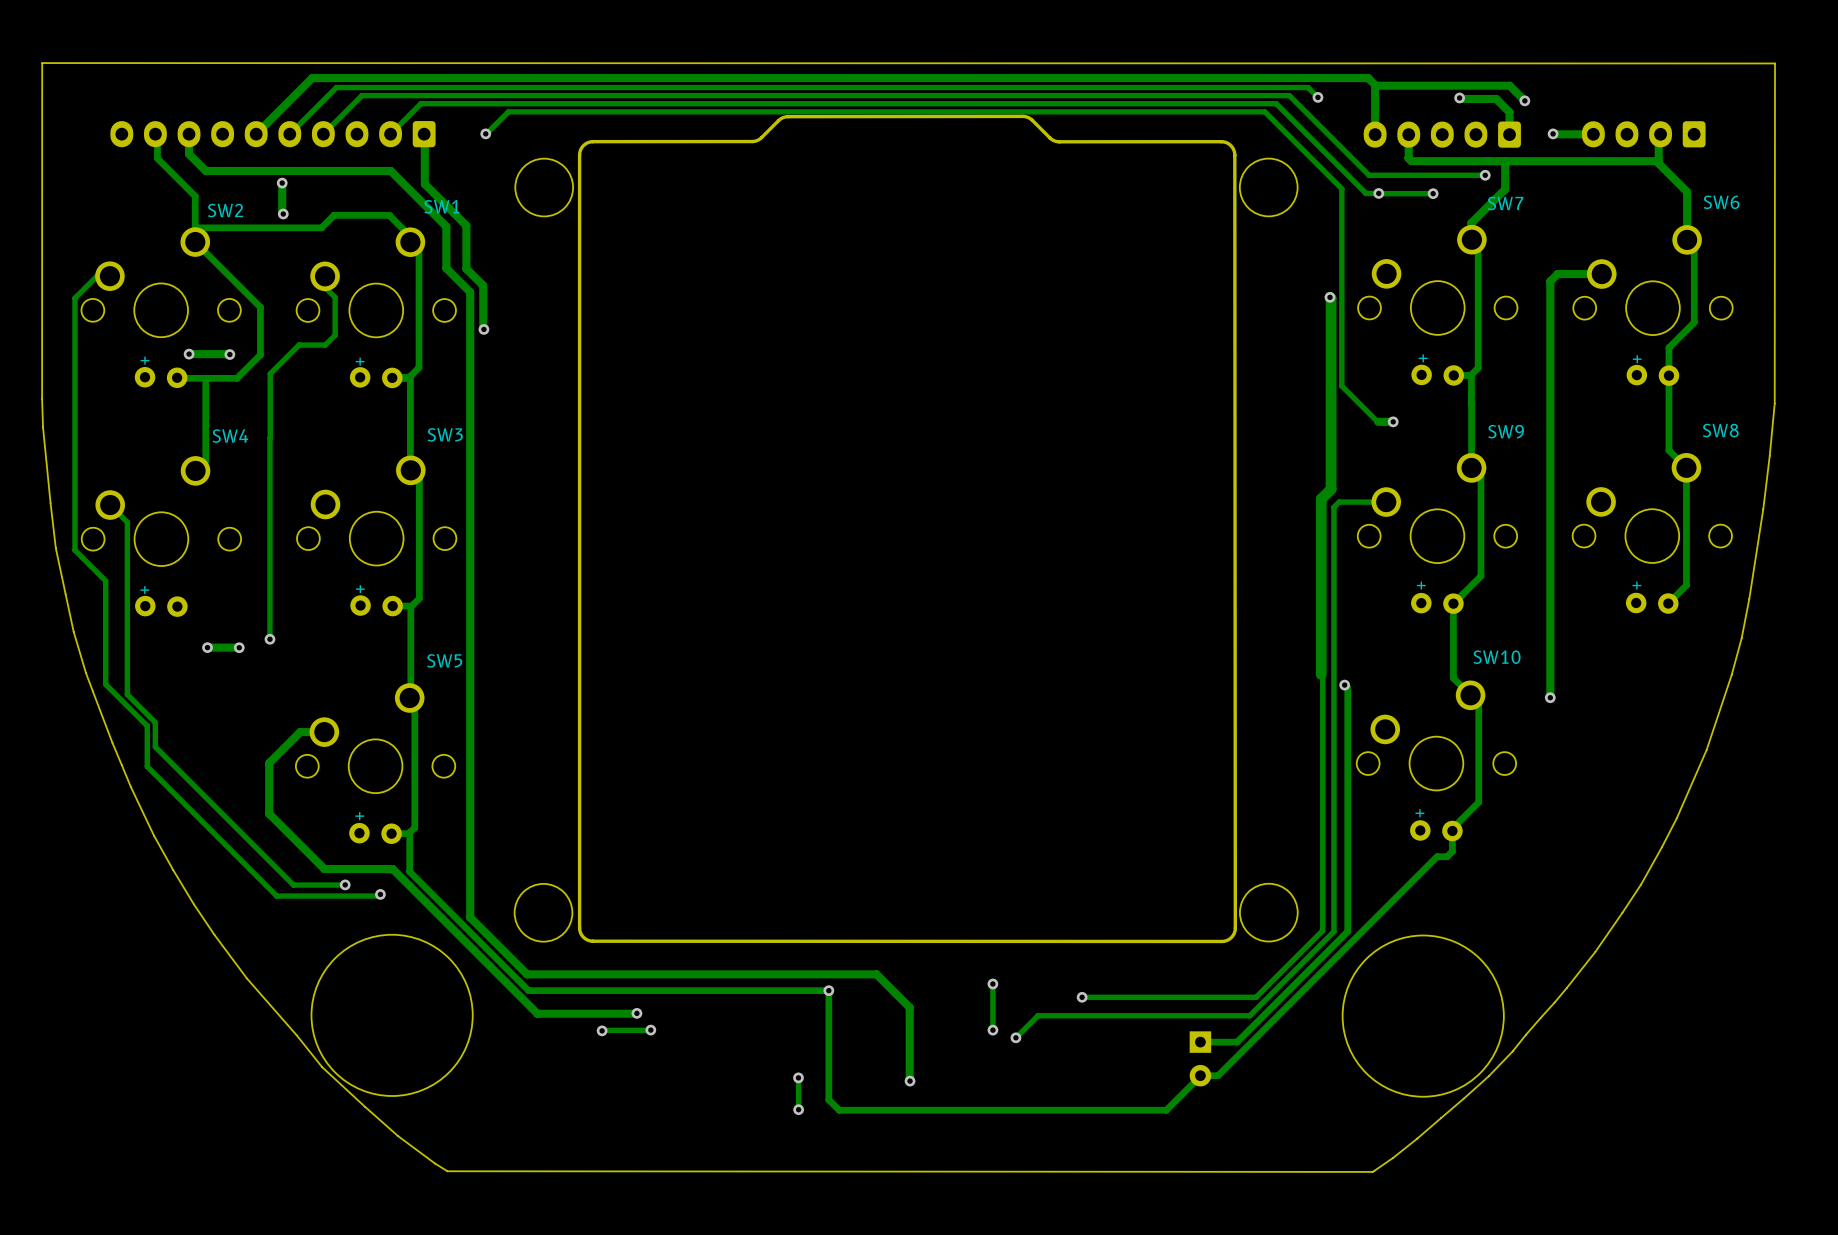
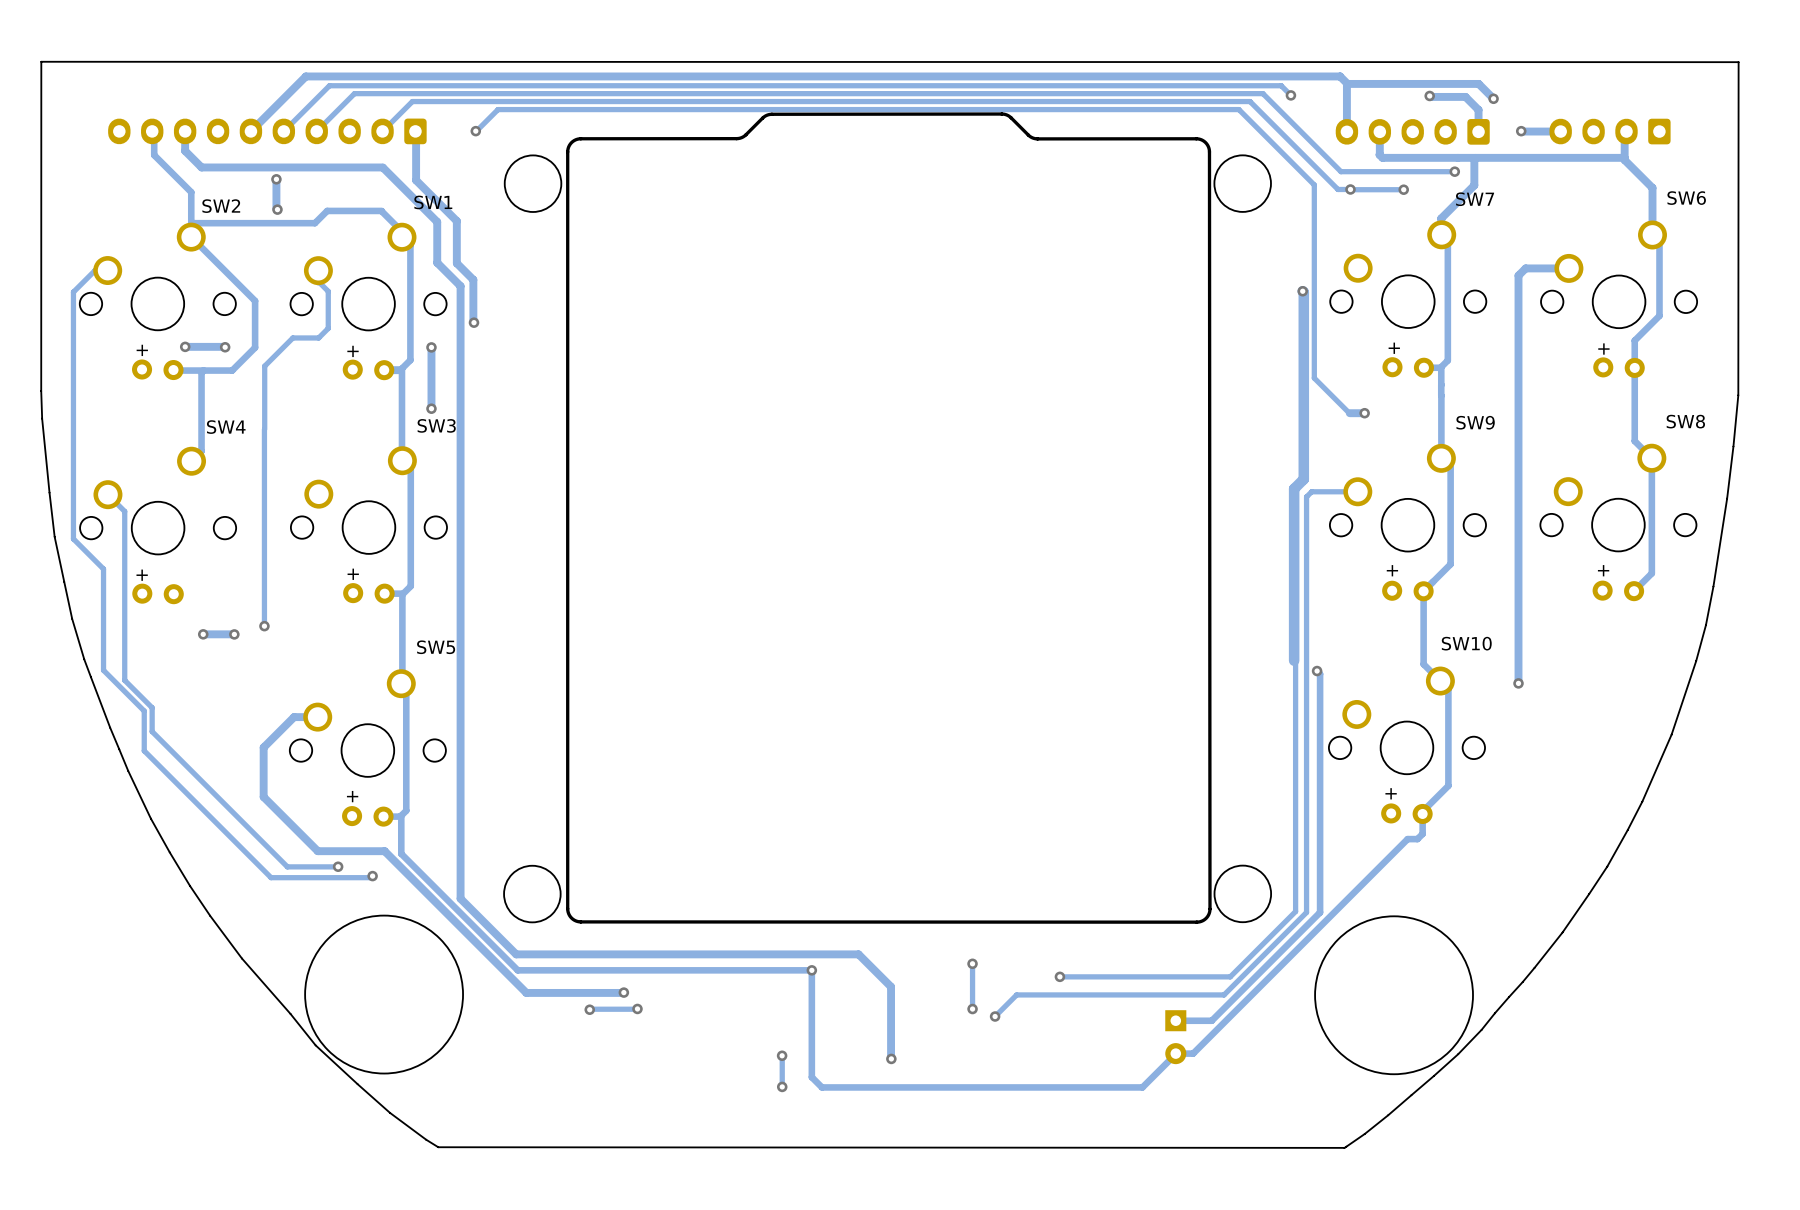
track: none -> (431, 347) (431, 408)
via: none -> (431, 347)
via: none -> (431, 408)

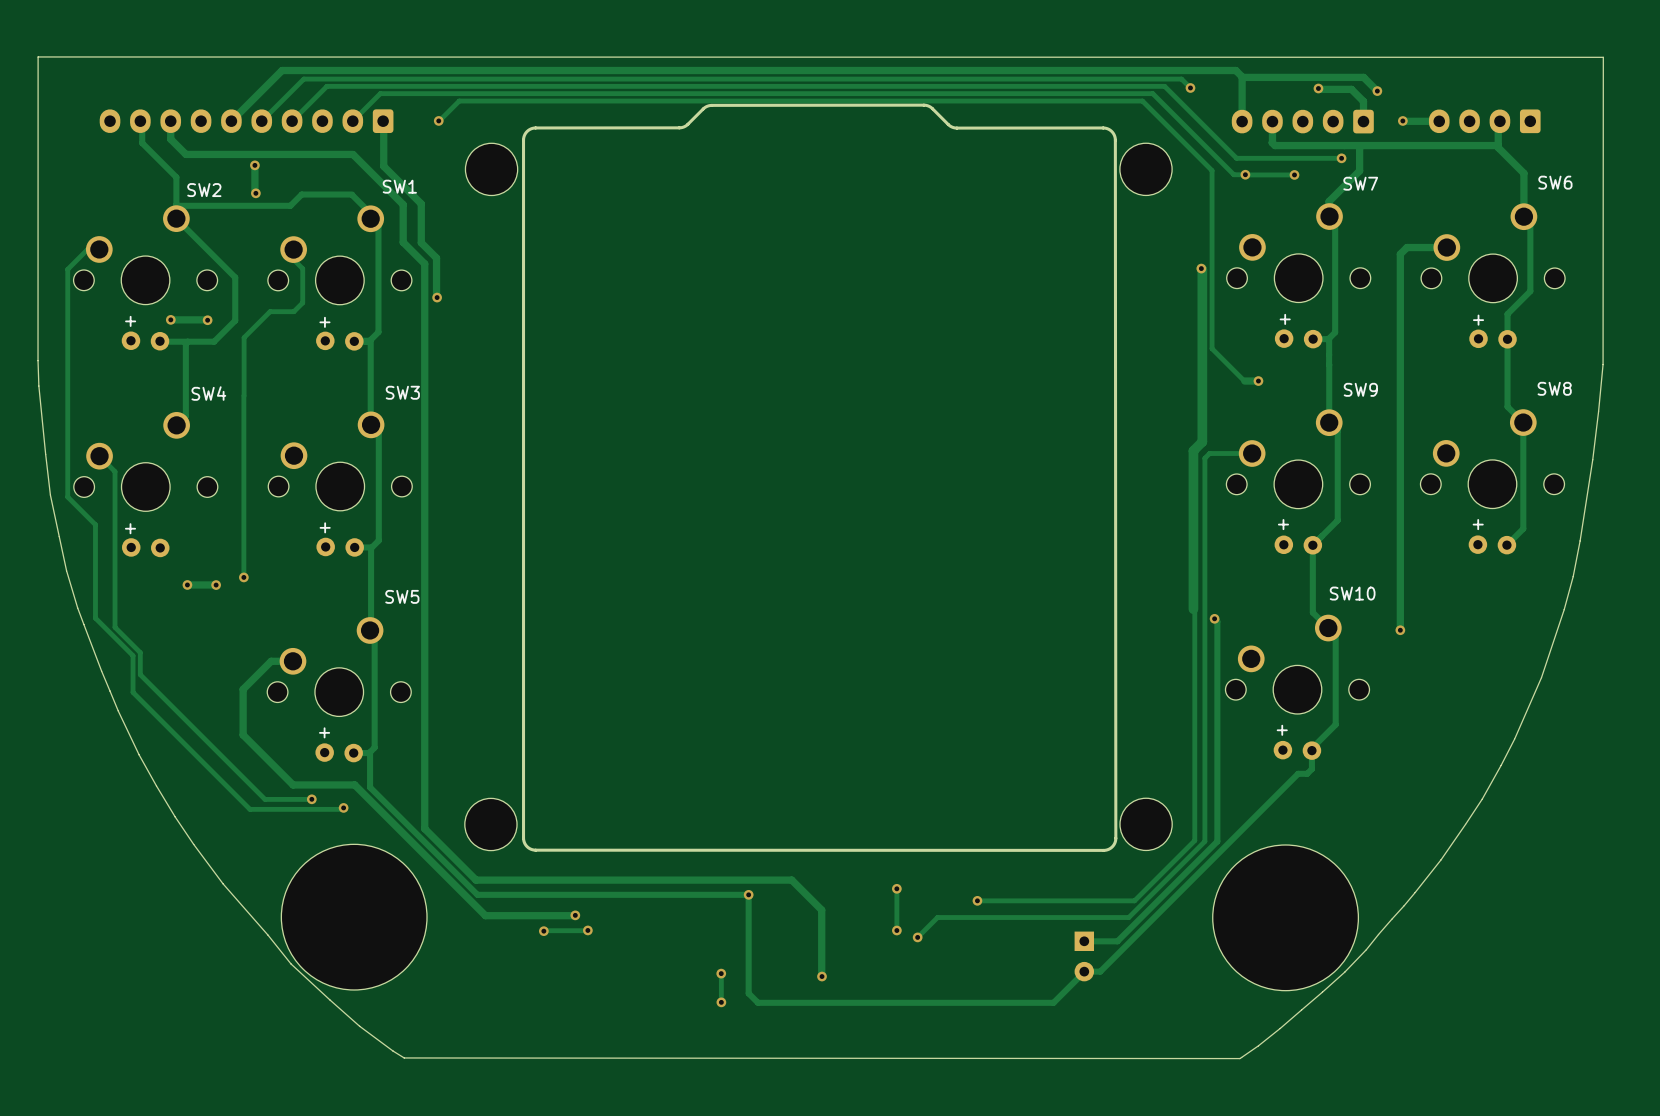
track: (431, 347) (431, 408) -> none
via: (431, 347) -> none
via: (431, 408) -> none

